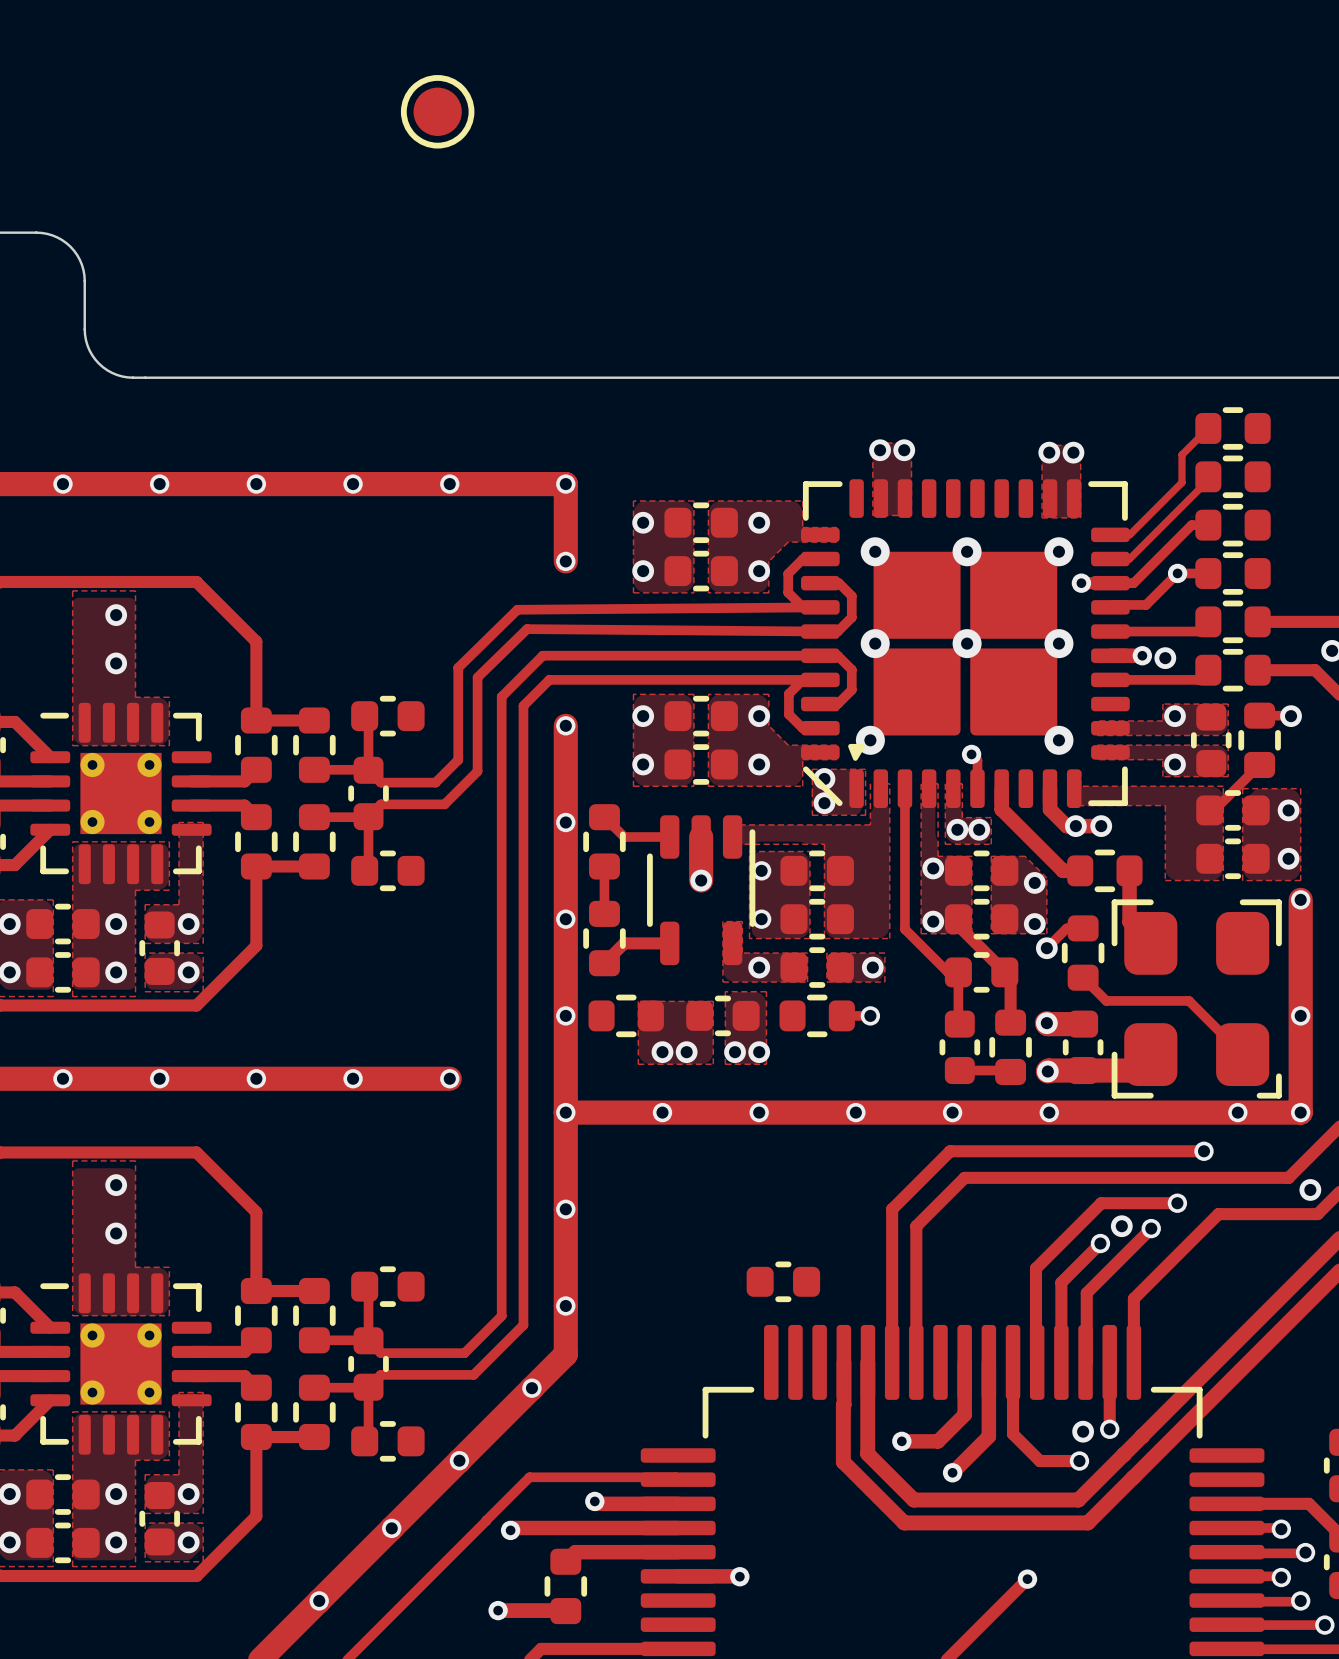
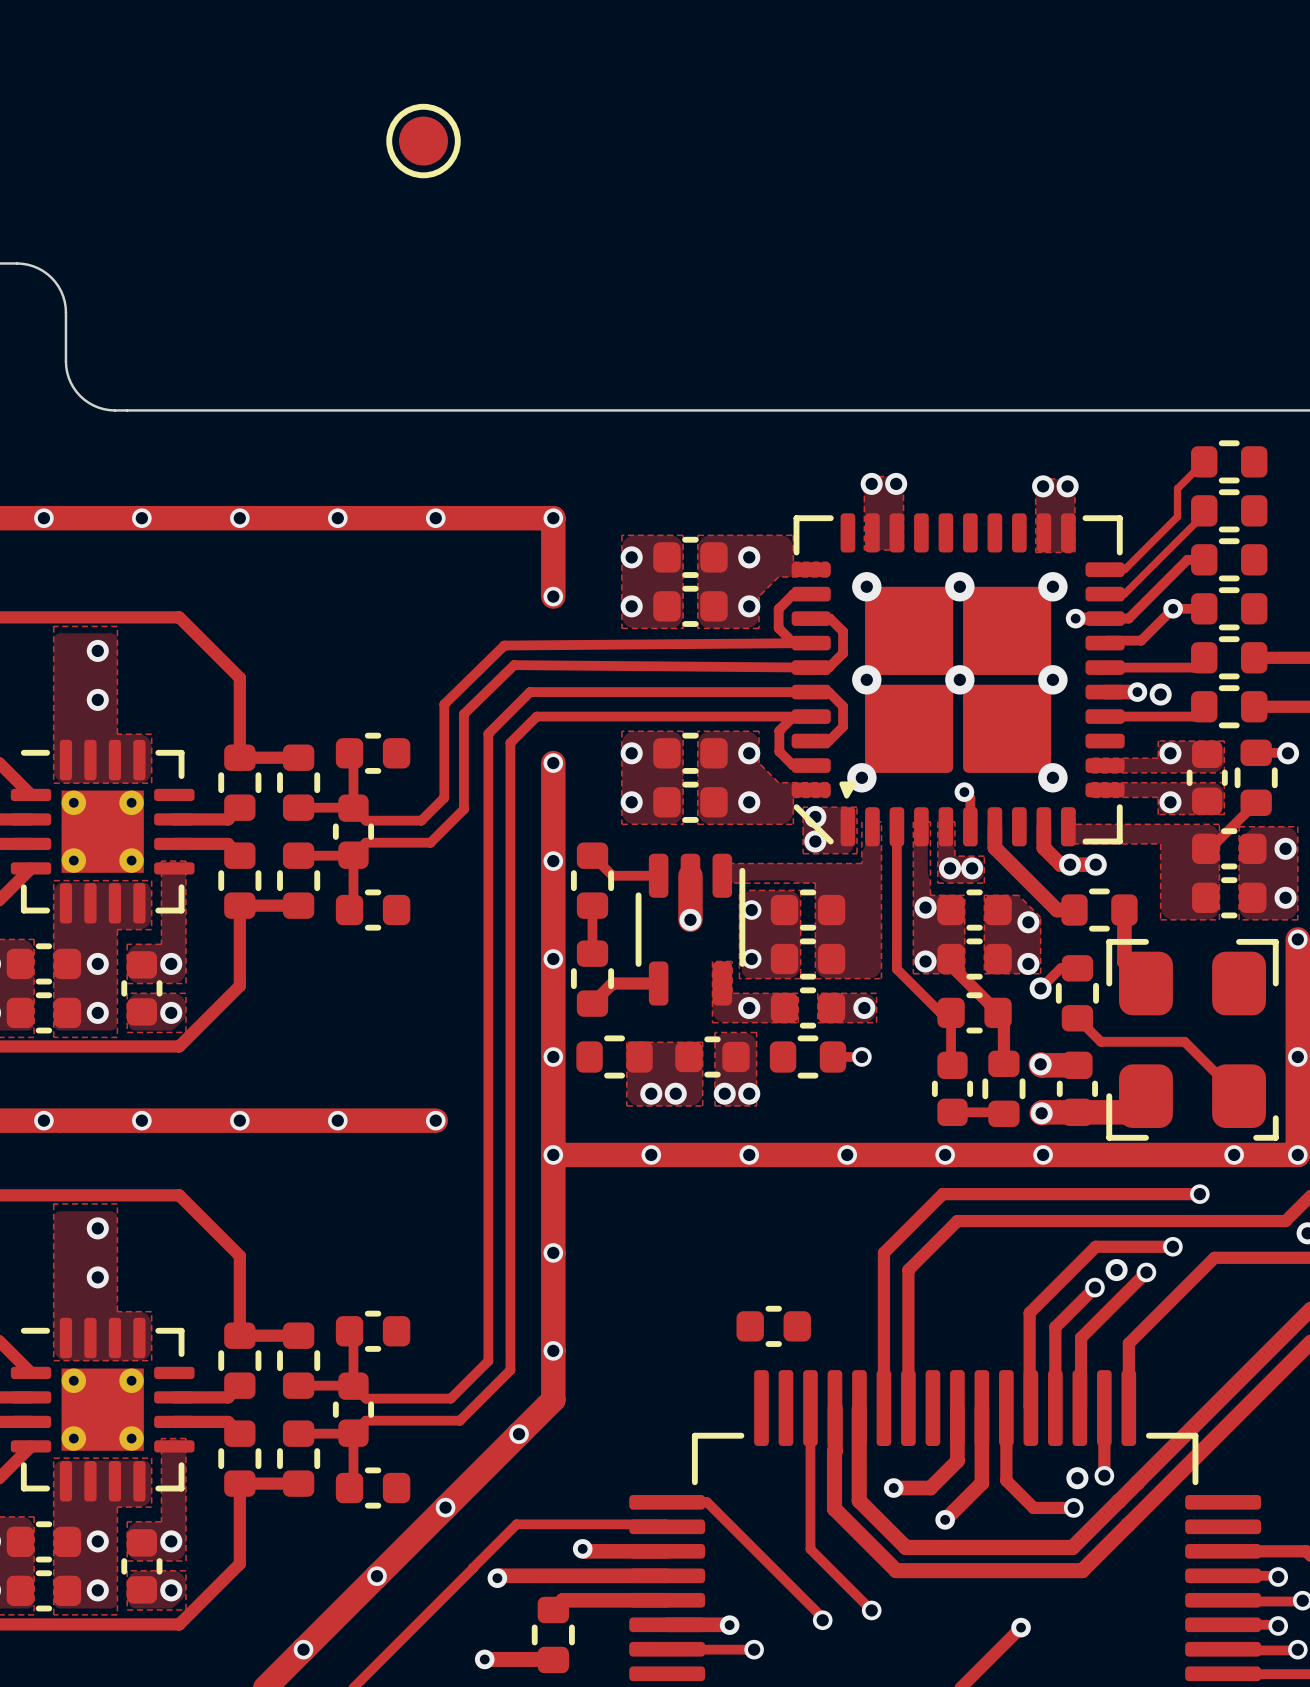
track: none -> (810, 1408) (810, 1549) (871, 1610)
track: none -> (667, 1502) (707, 1502) (822, 1617) (822, 1620)
via: none -> (871, 1610)
via: none -> (822, 1620)
track: none -> (667, 1649) (754, 1649)
via: none -> (754, 1649)

